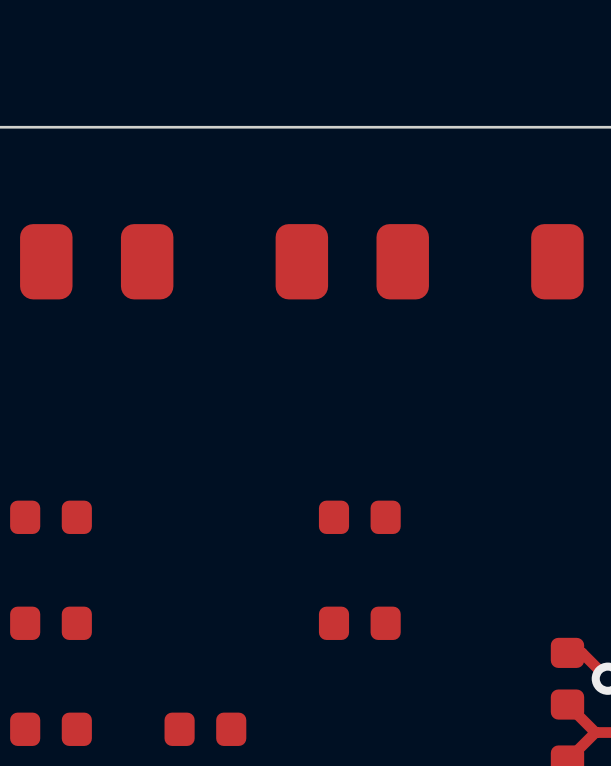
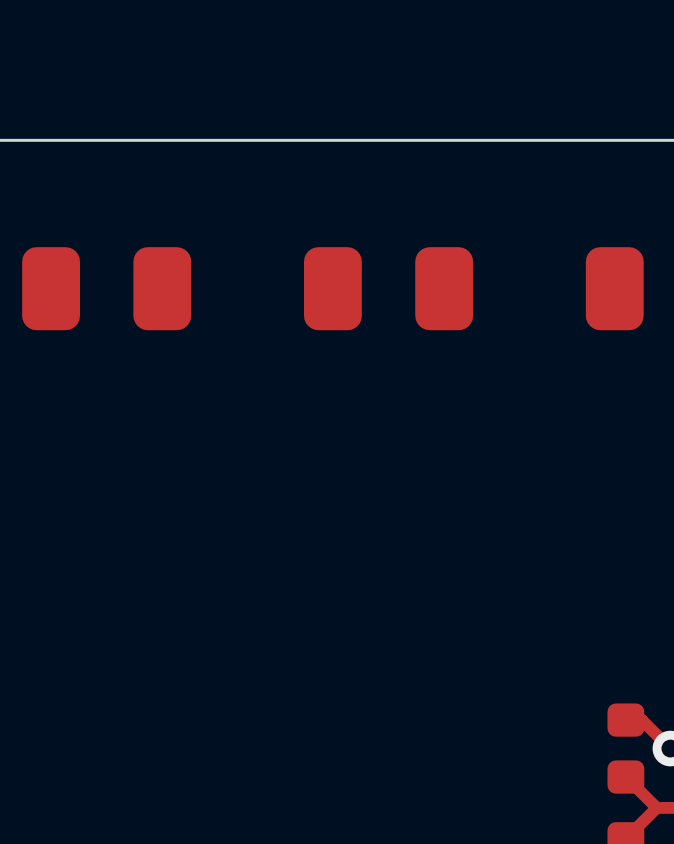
part: (51, 517) -> none
part: (359, 517) -> none
part: (51, 623) -> none
part: (359, 623) -> none
part: (51, 729) -> none
part: (205, 729) -> none

